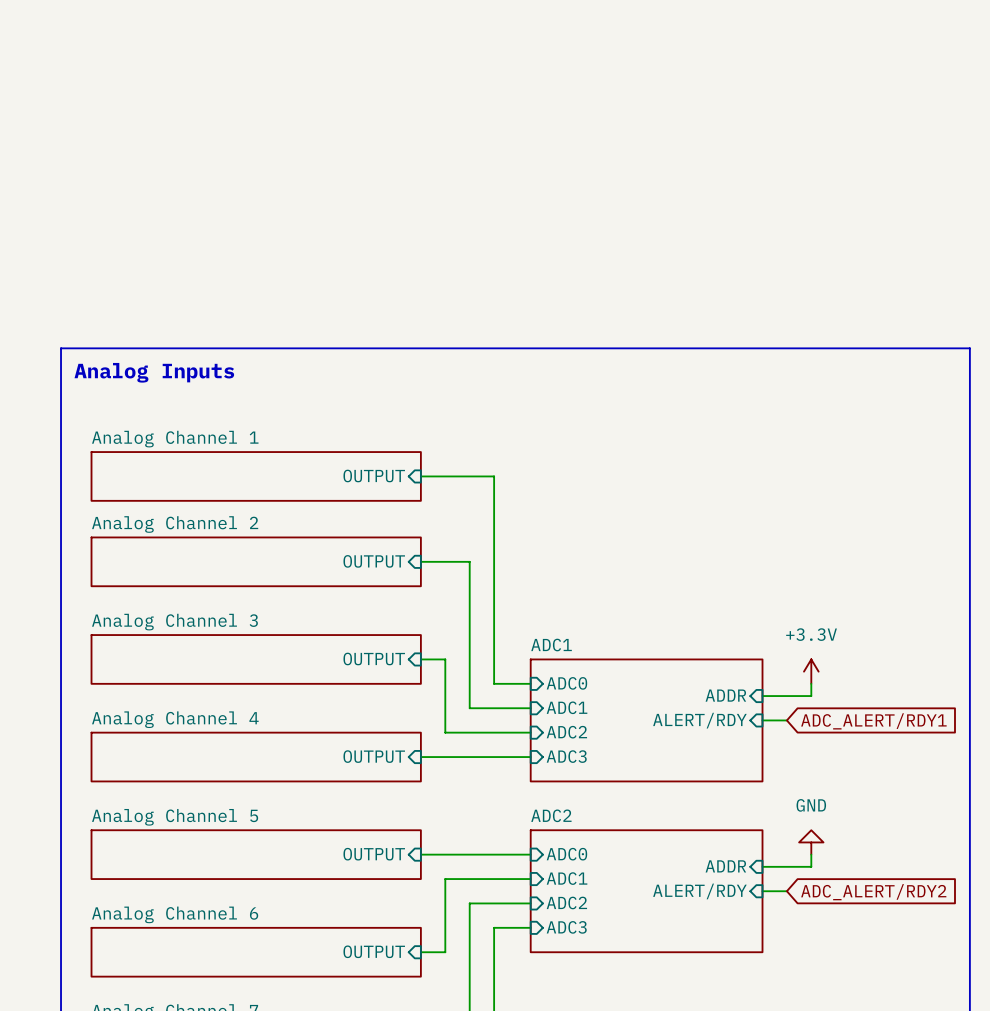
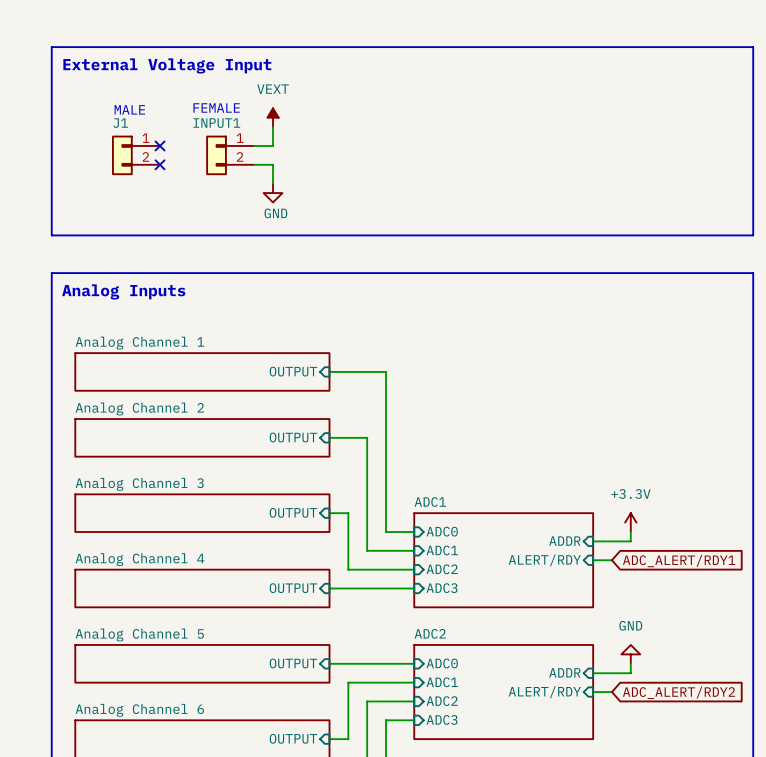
line: none -> (51, 47) (753, 47) (753, 235) (51, 235) (51, 47)
text: none -> External Voltage Input (167, 65)
text: none -> FEMALE (216, 107)
text: none -> MALE (129, 109)
power symbol: none -> VEXT (273, 117)
wire: none -> (273, 127) (273, 145) (254, 145)
no-connect mark: none -> (160, 145)
J1: none -> (136, 155)
INPUT1: none -> (230, 155)
no-connect mark: none -> (160, 164)
wire: none -> (254, 164) (273, 164) (273, 183)
power symbol: none -> GND (273, 193)

